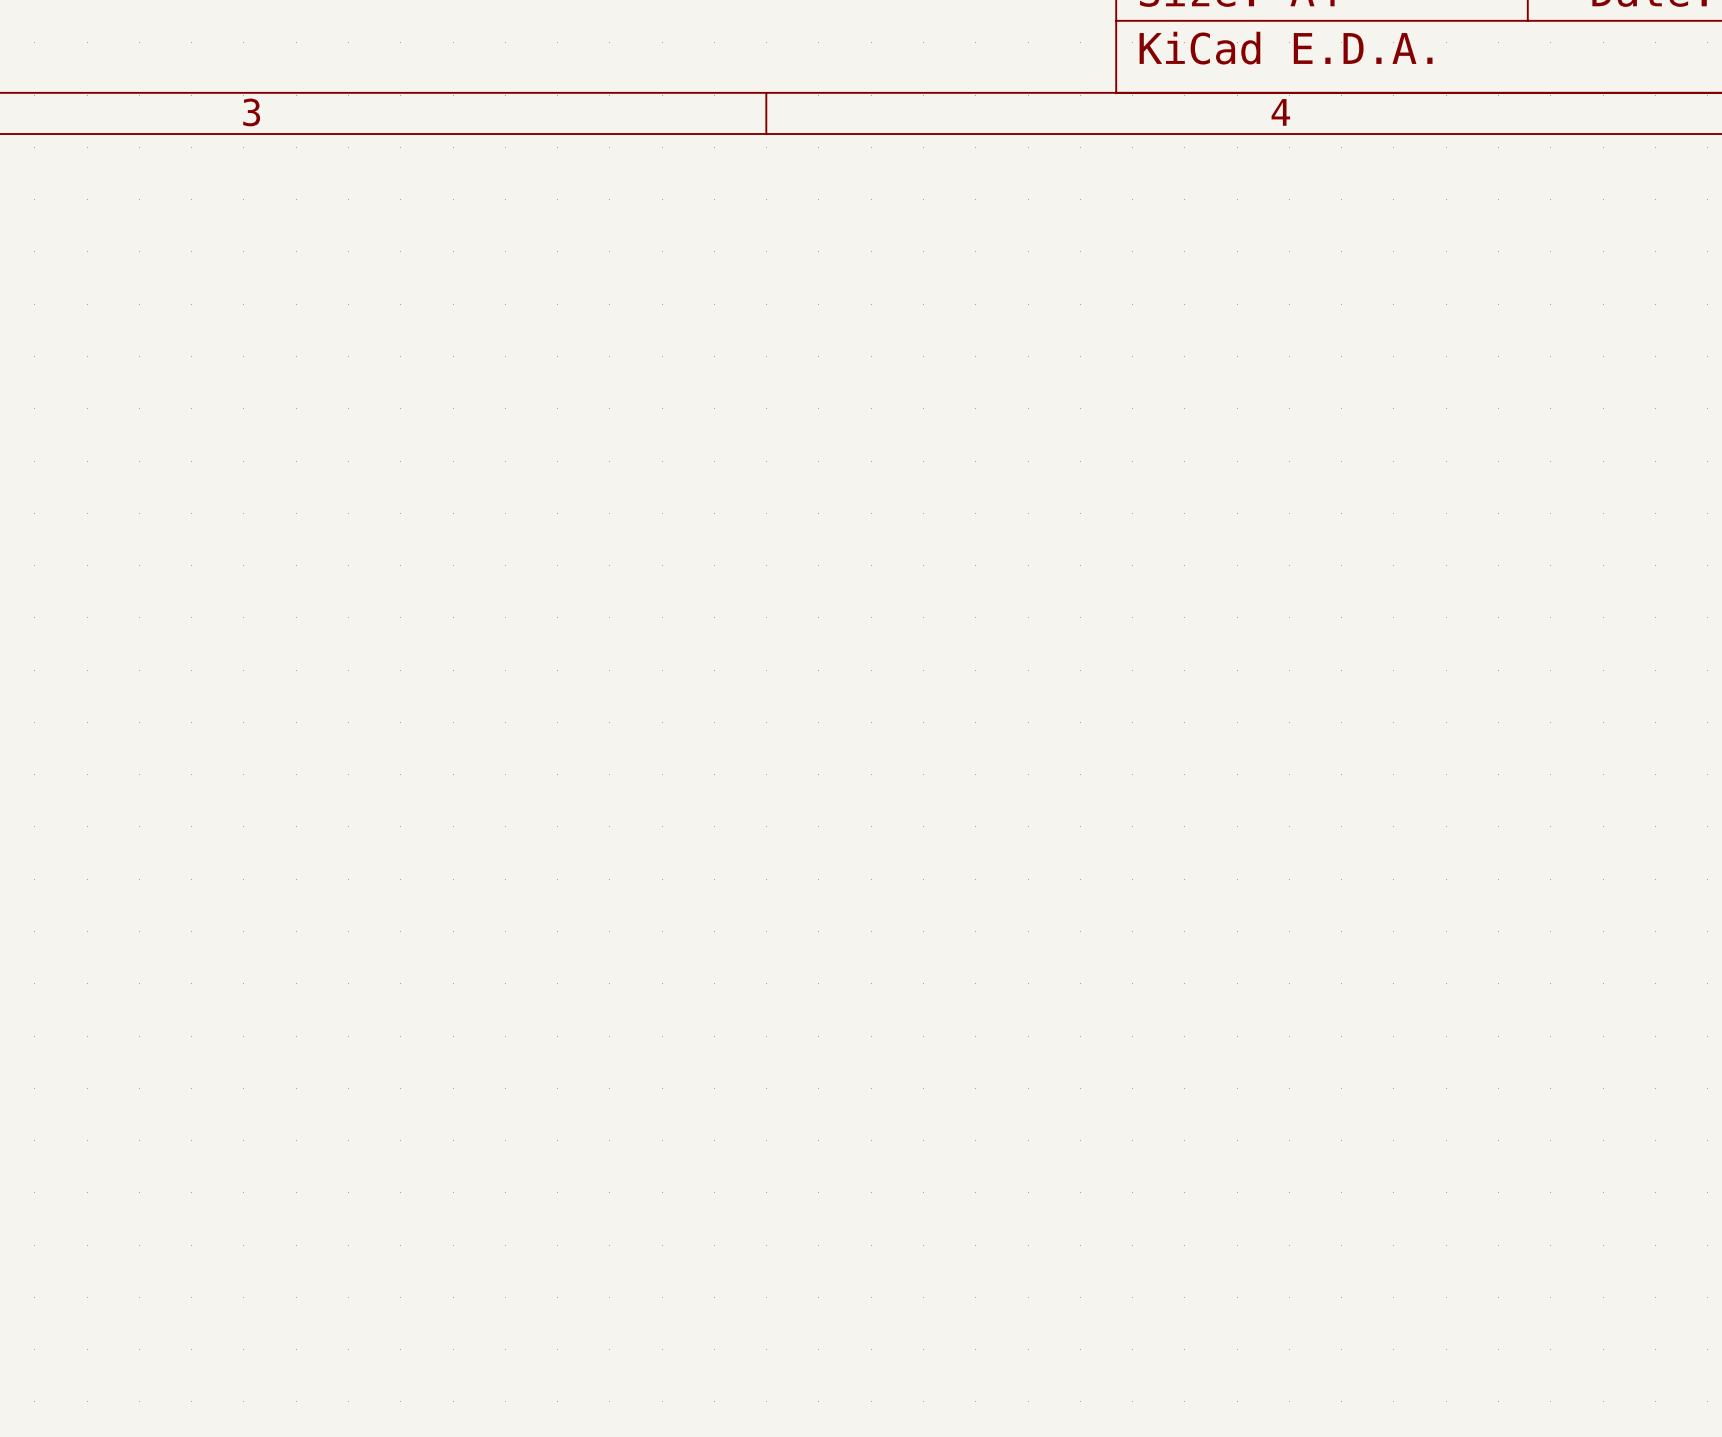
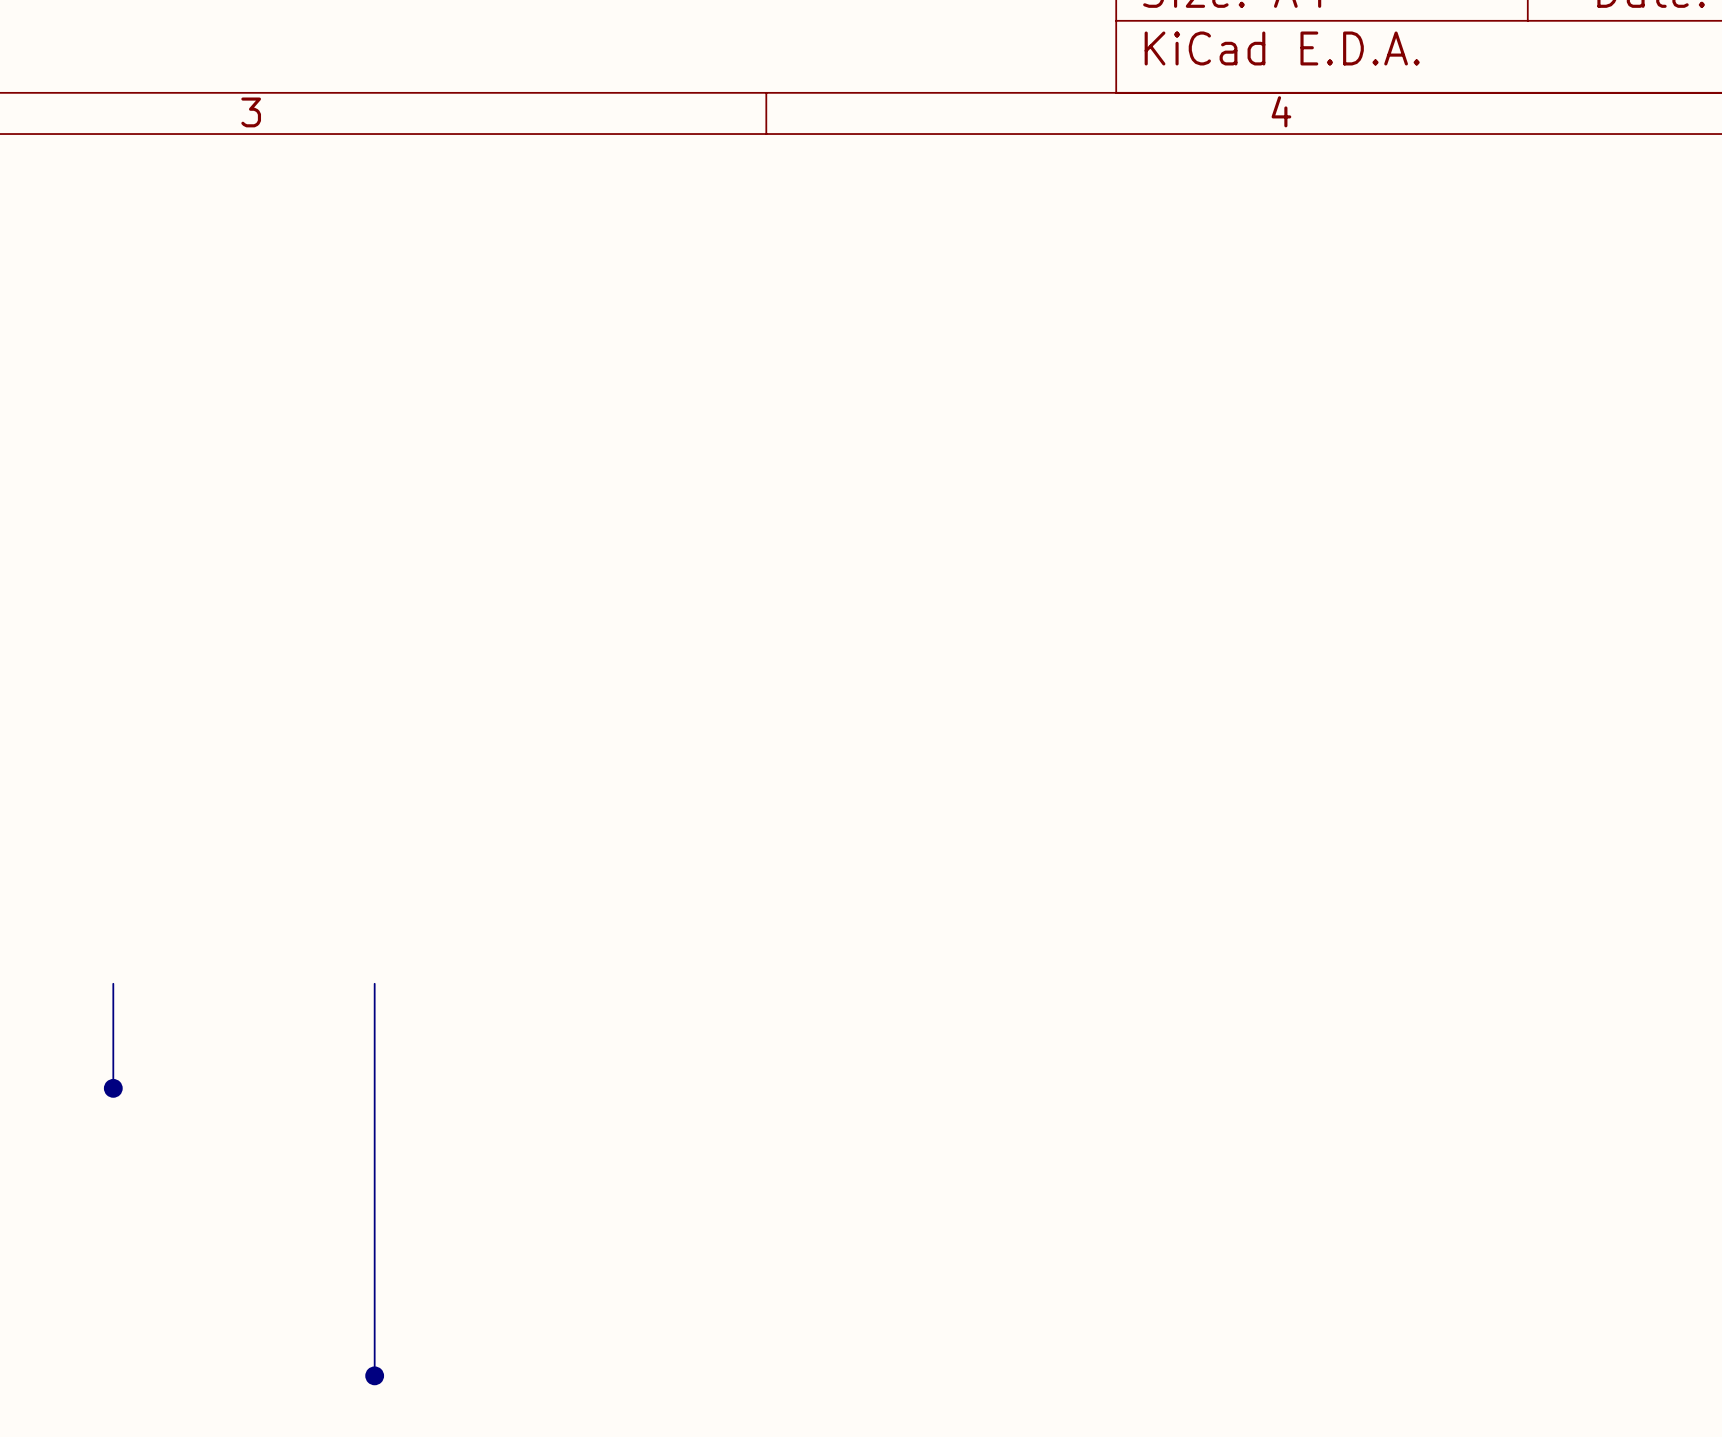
wire: none -> (113, 983) (113, 1088)
wire: none -> (374, 983) (374, 1375)
junction: none -> (113, 1088)
junction: none -> (374, 1375)

